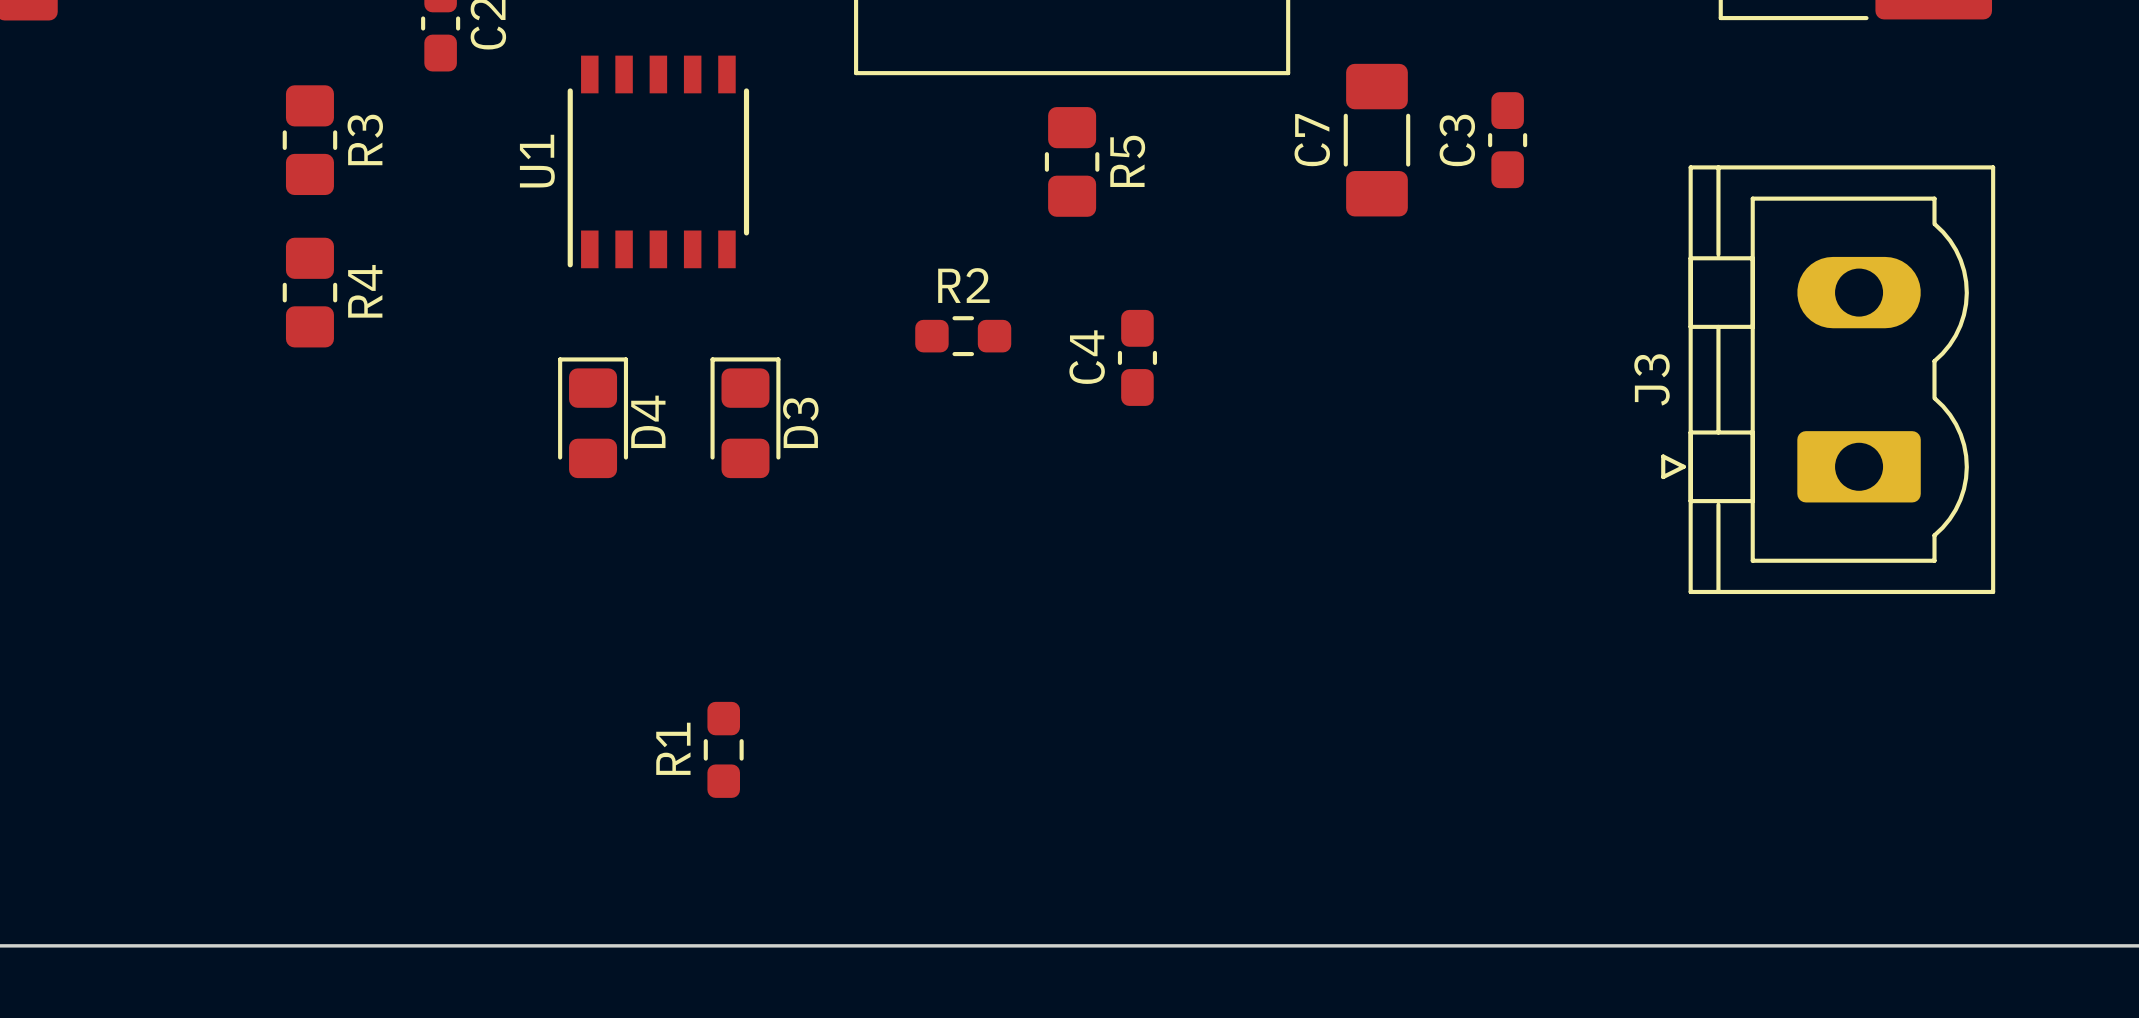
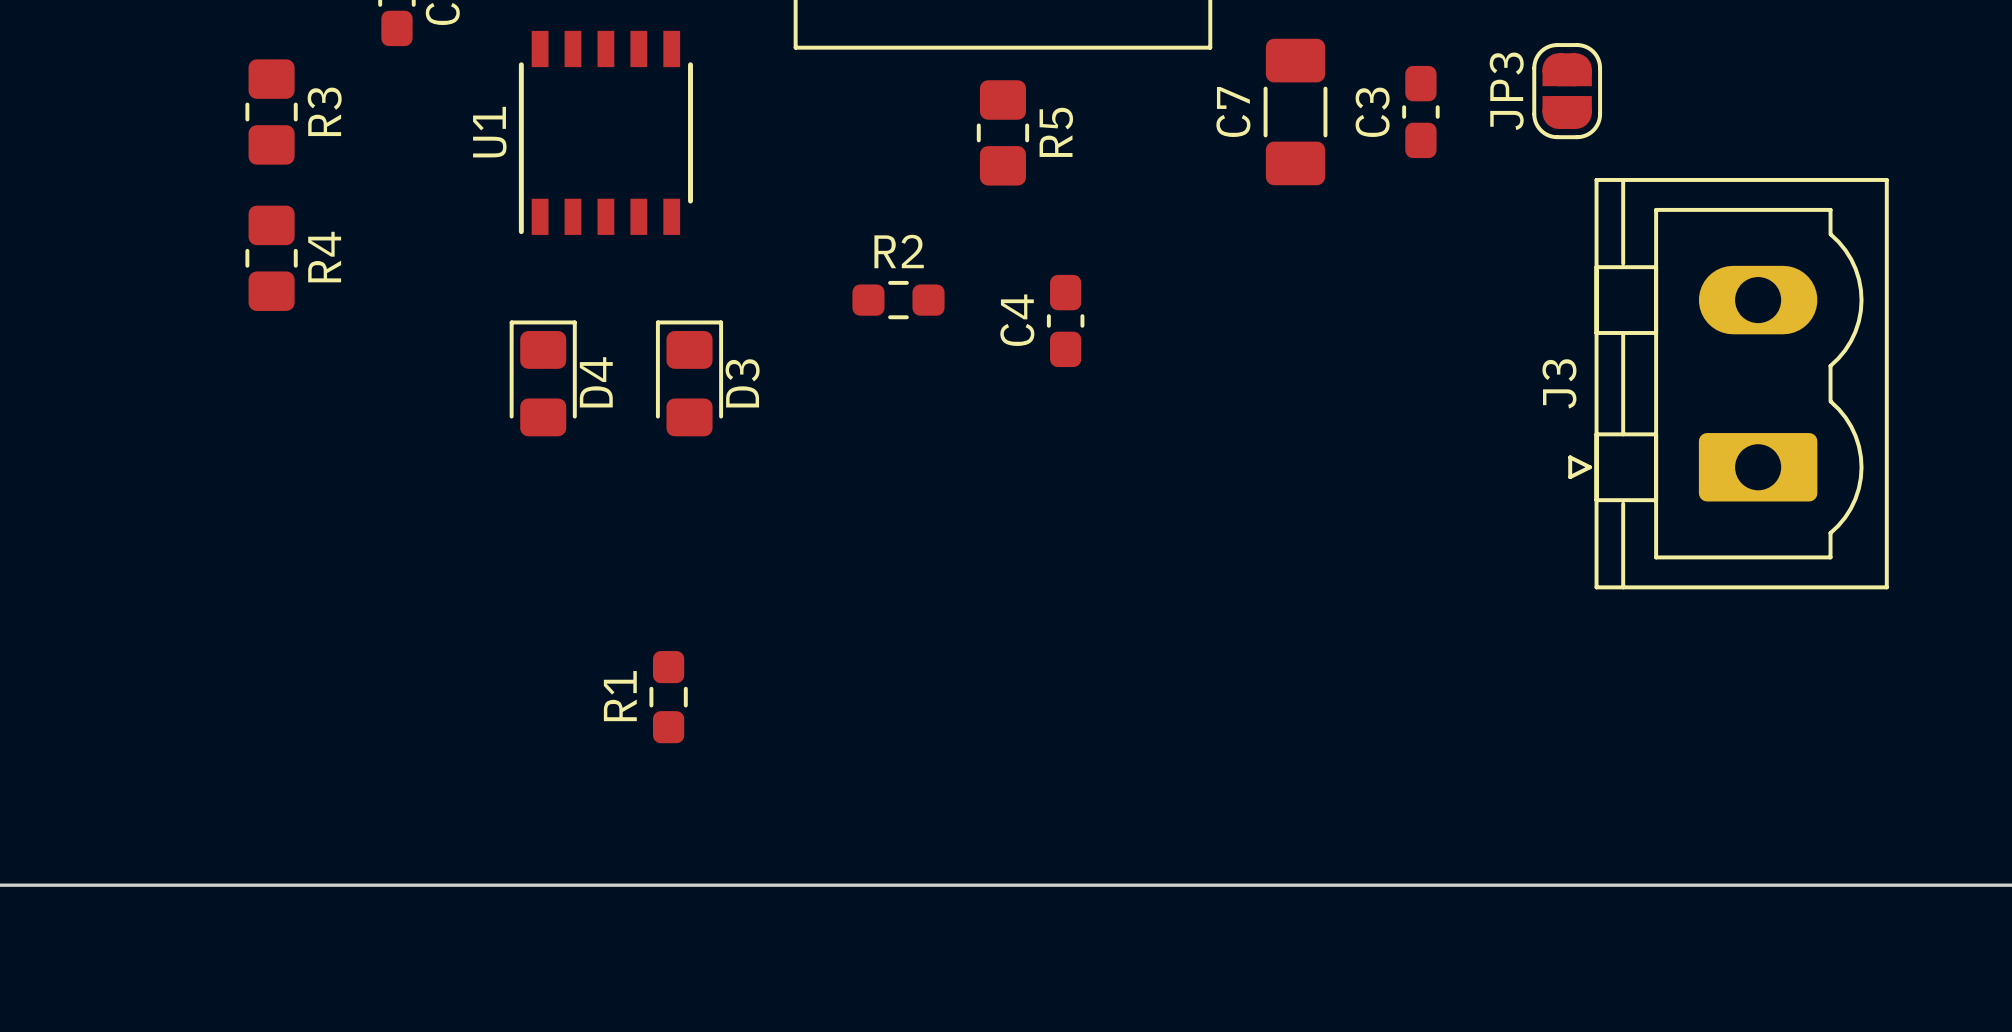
JP3: none -> (1567, 91)
J3 position: (1828, 379) -> (1728, 383)

